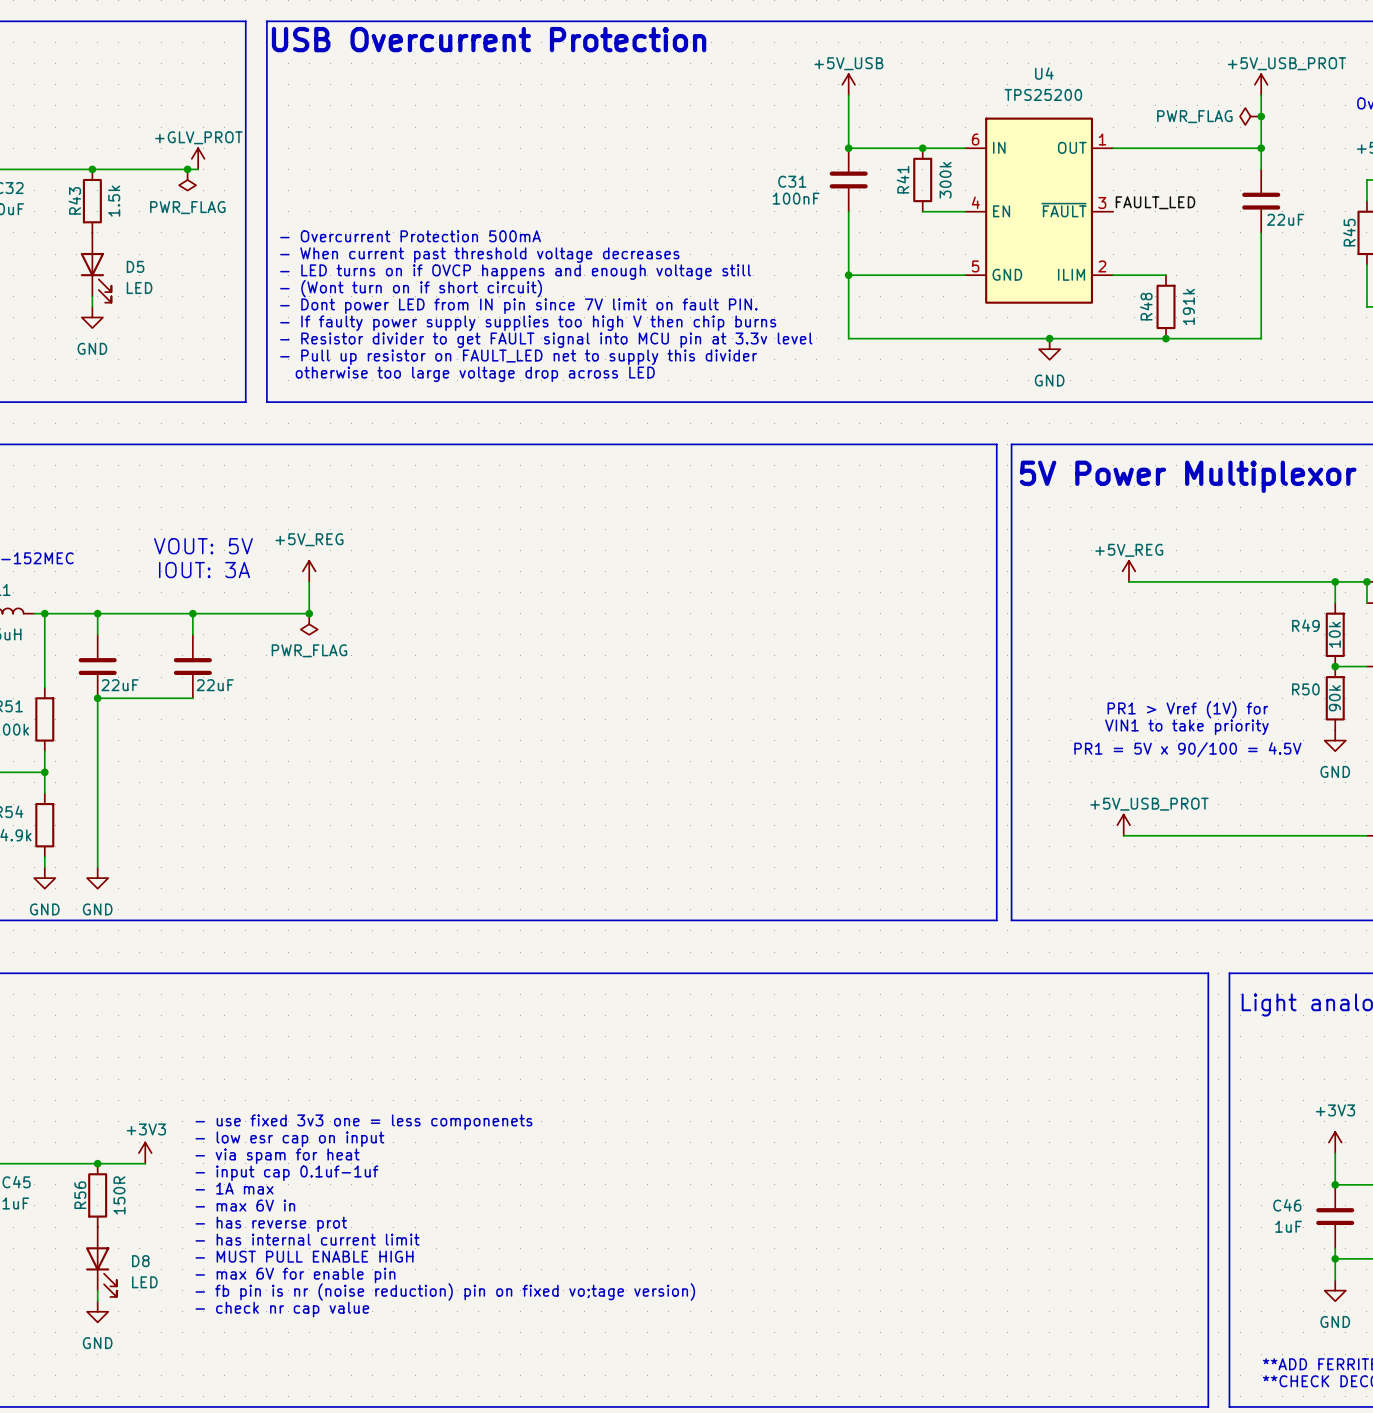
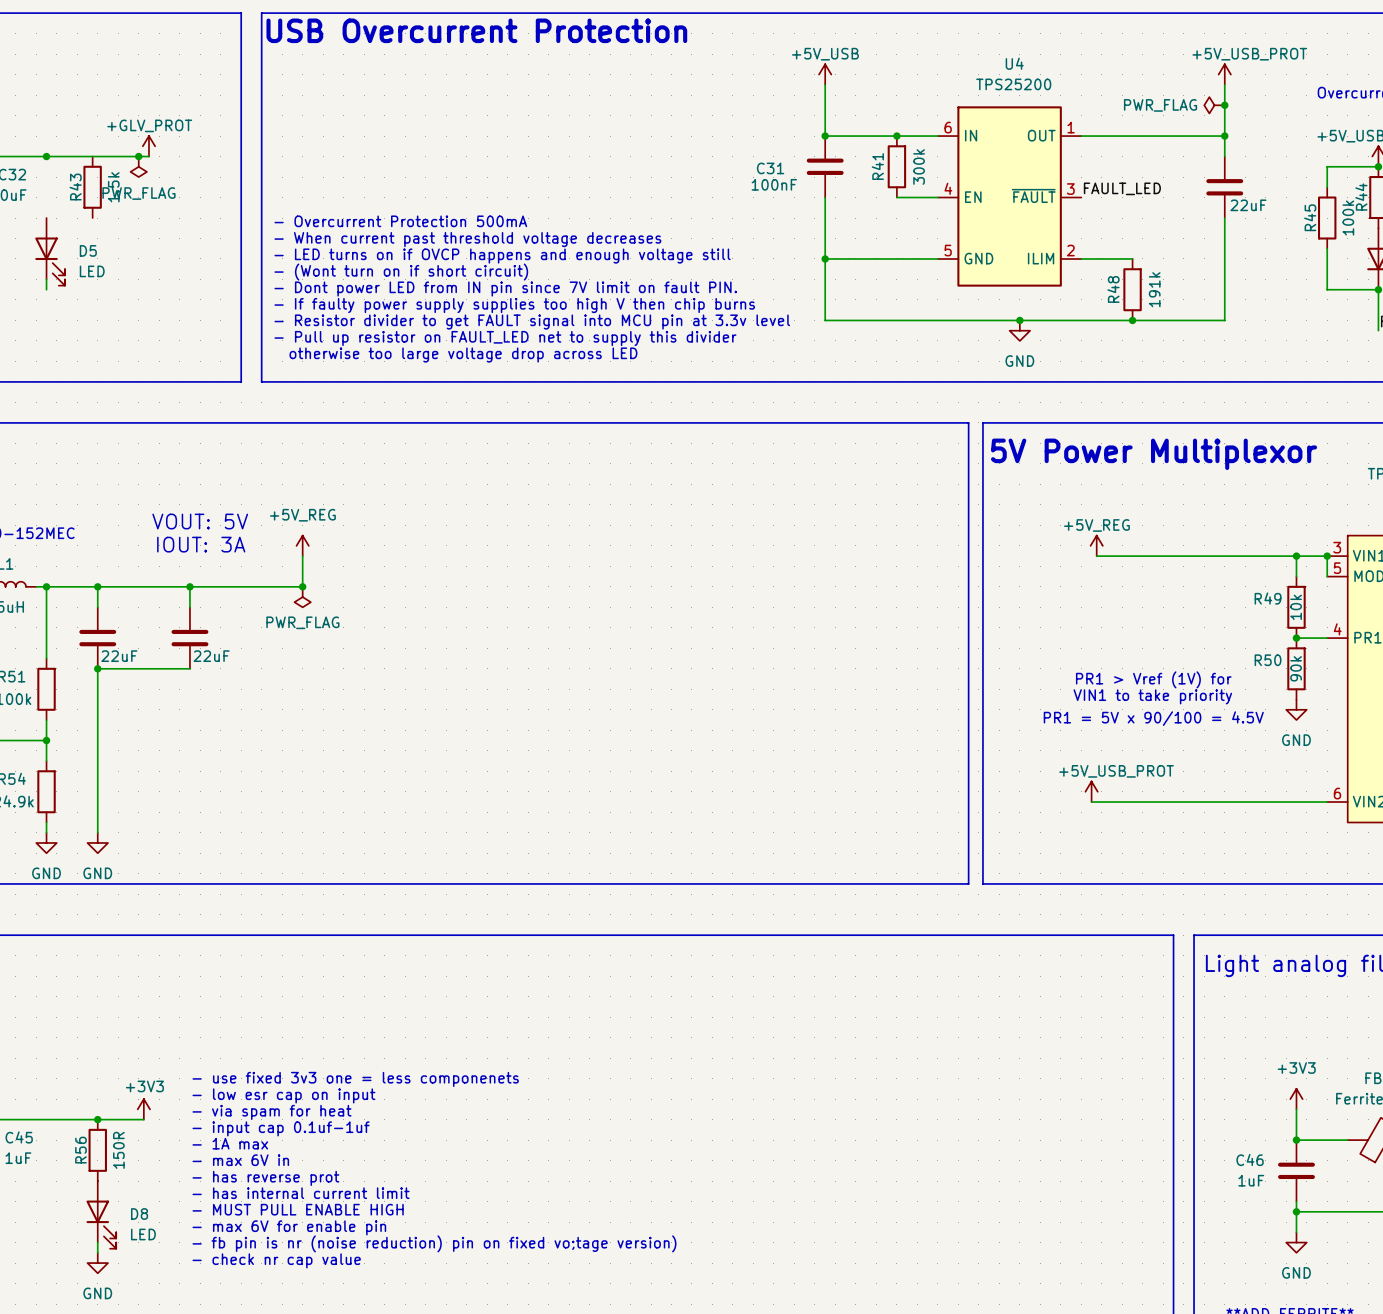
power symbol position: +GLV_PROT (198, 158) -> +GLV_PROT (148, 146)
junction: none -> (46, 156)
junction: (92, 169) -> none
junction: none -> (138, 156)
wire: (150, 169) (198, 169) -> none
junction: (187, 169) -> none
power symbol position: PWR_FLAG (187, 179) -> PWR_FLAG (138, 166)
D5 position: (96, 267) -> (50, 251)
wire: (92, 296) (92, 306) -> (46, 279) (46, 289)
power symbol: GND (92, 317) -> none

